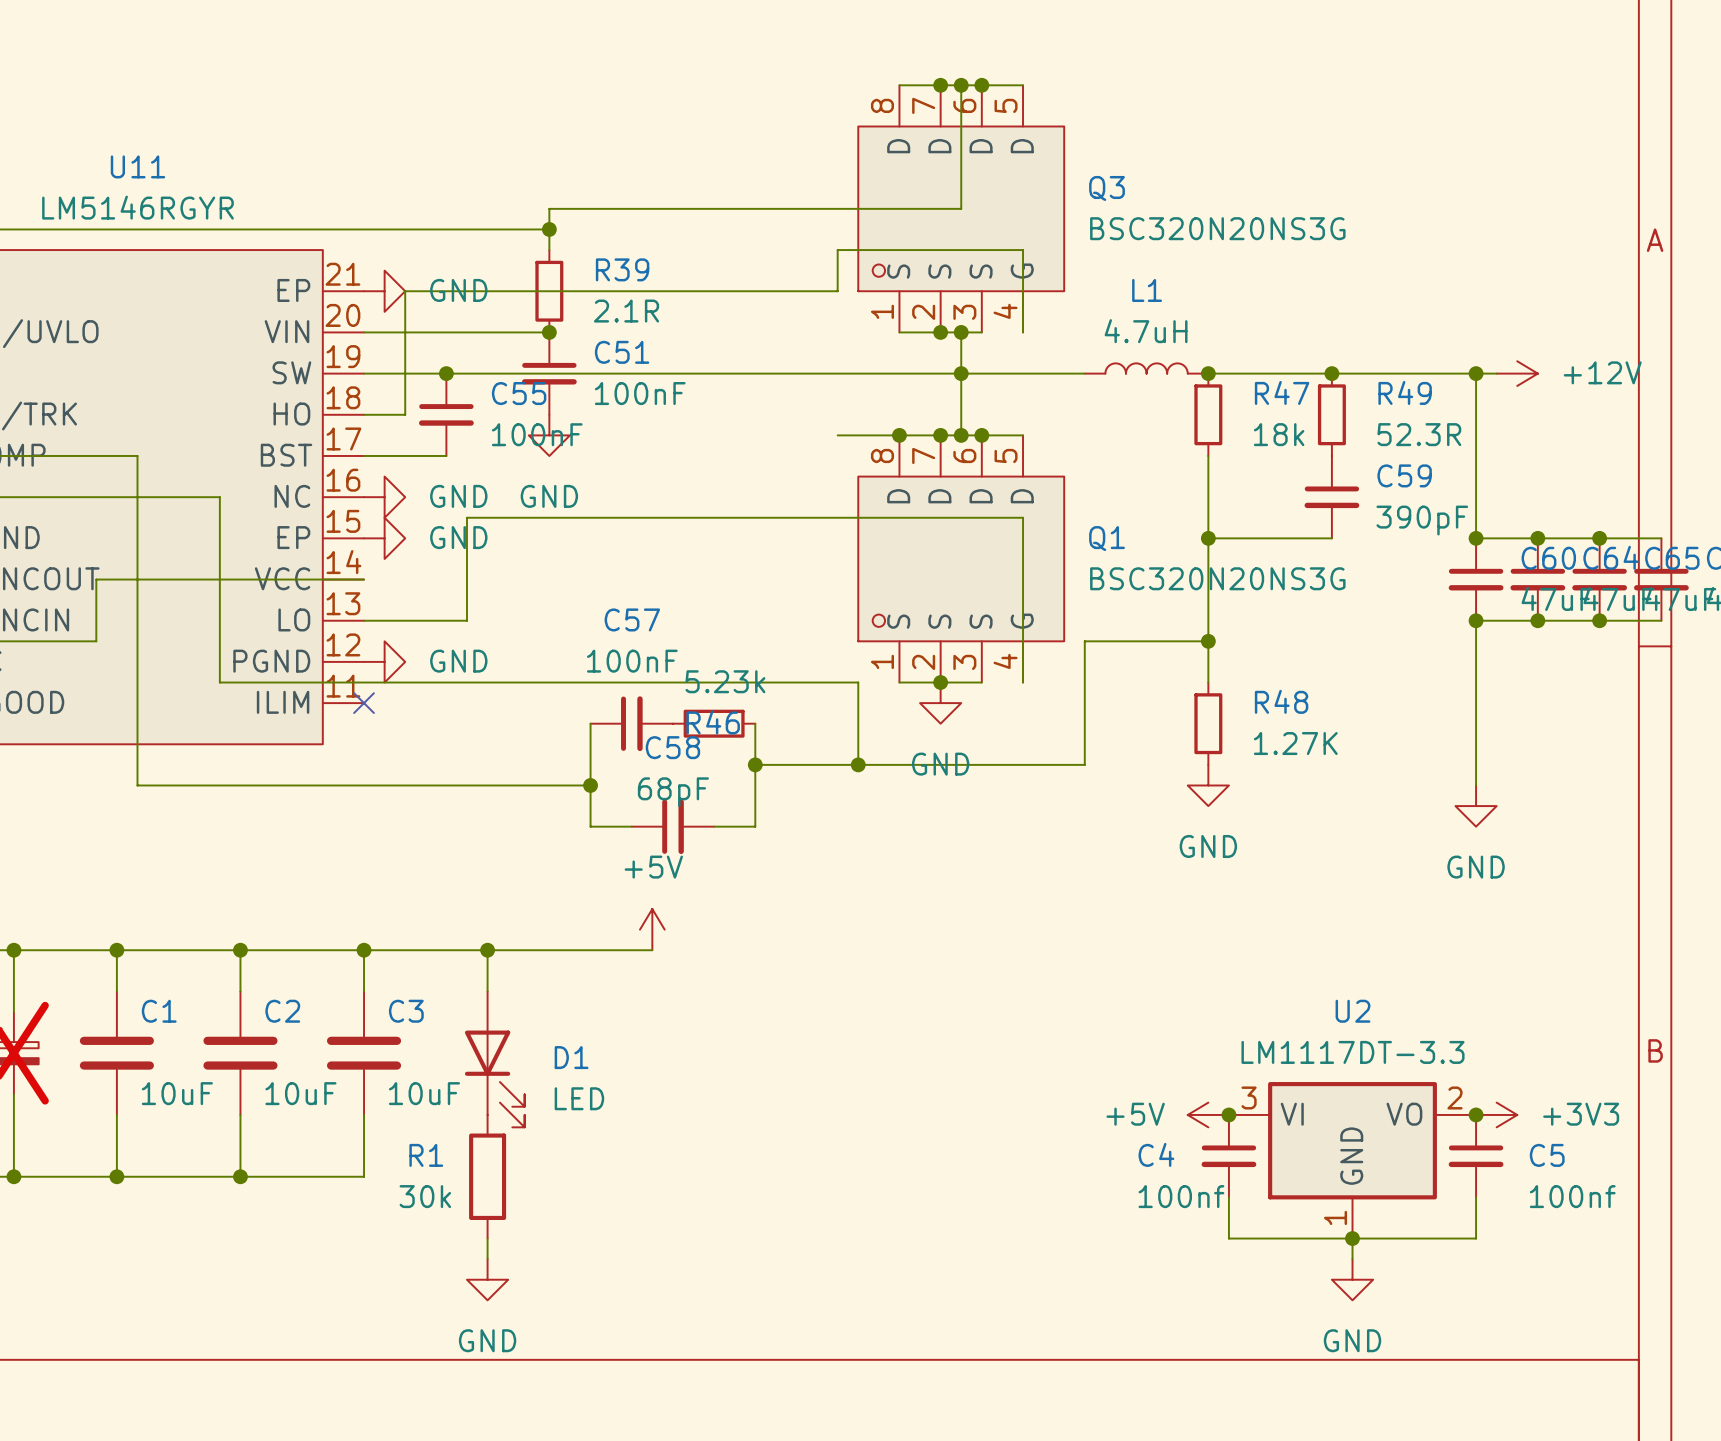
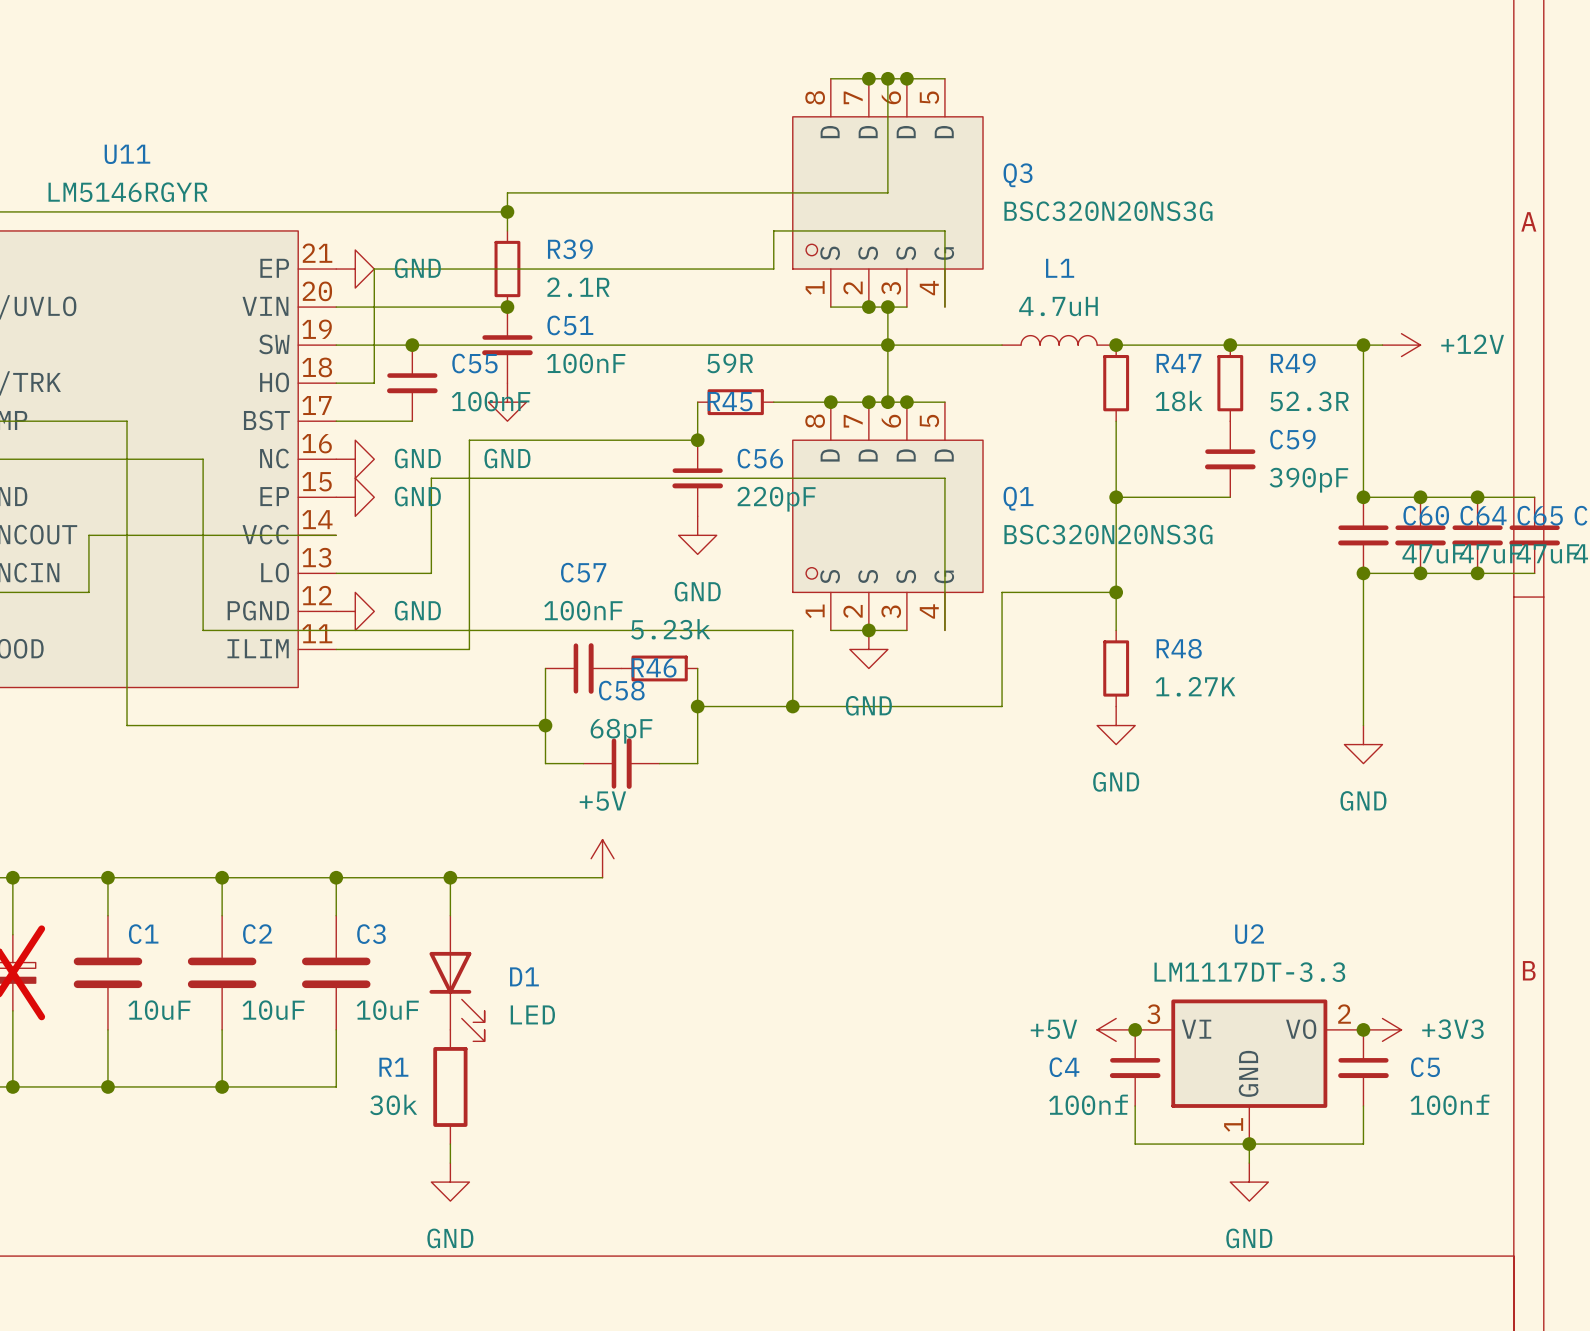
wire: none -> (697, 402) (697, 440) (469, 440) (469, 649) (336, 649)
R45: none -> 59R (735, 402)
junction: none -> (697, 440)
C56: none -> 220pF (697, 478)
power symbol: none -> GND (697, 535)
no-connect mark: (364, 703) -> none

